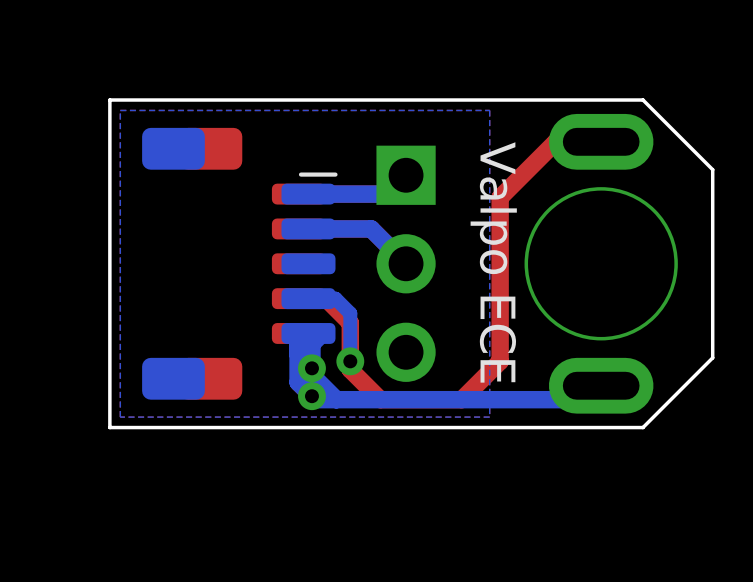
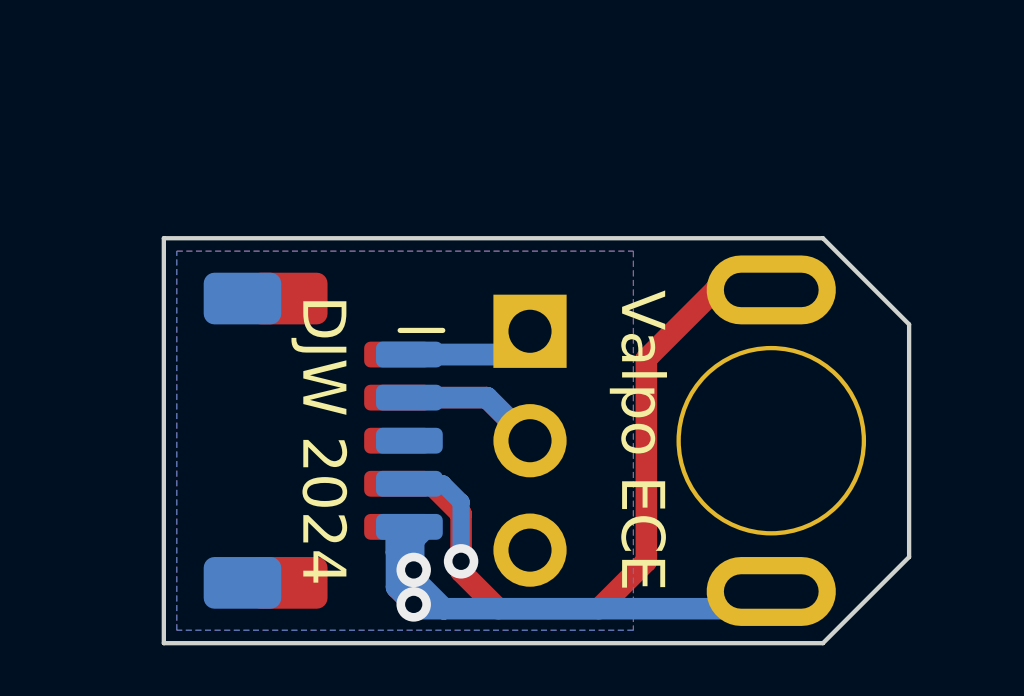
text: none -> DJW 2024 (319, 441)

